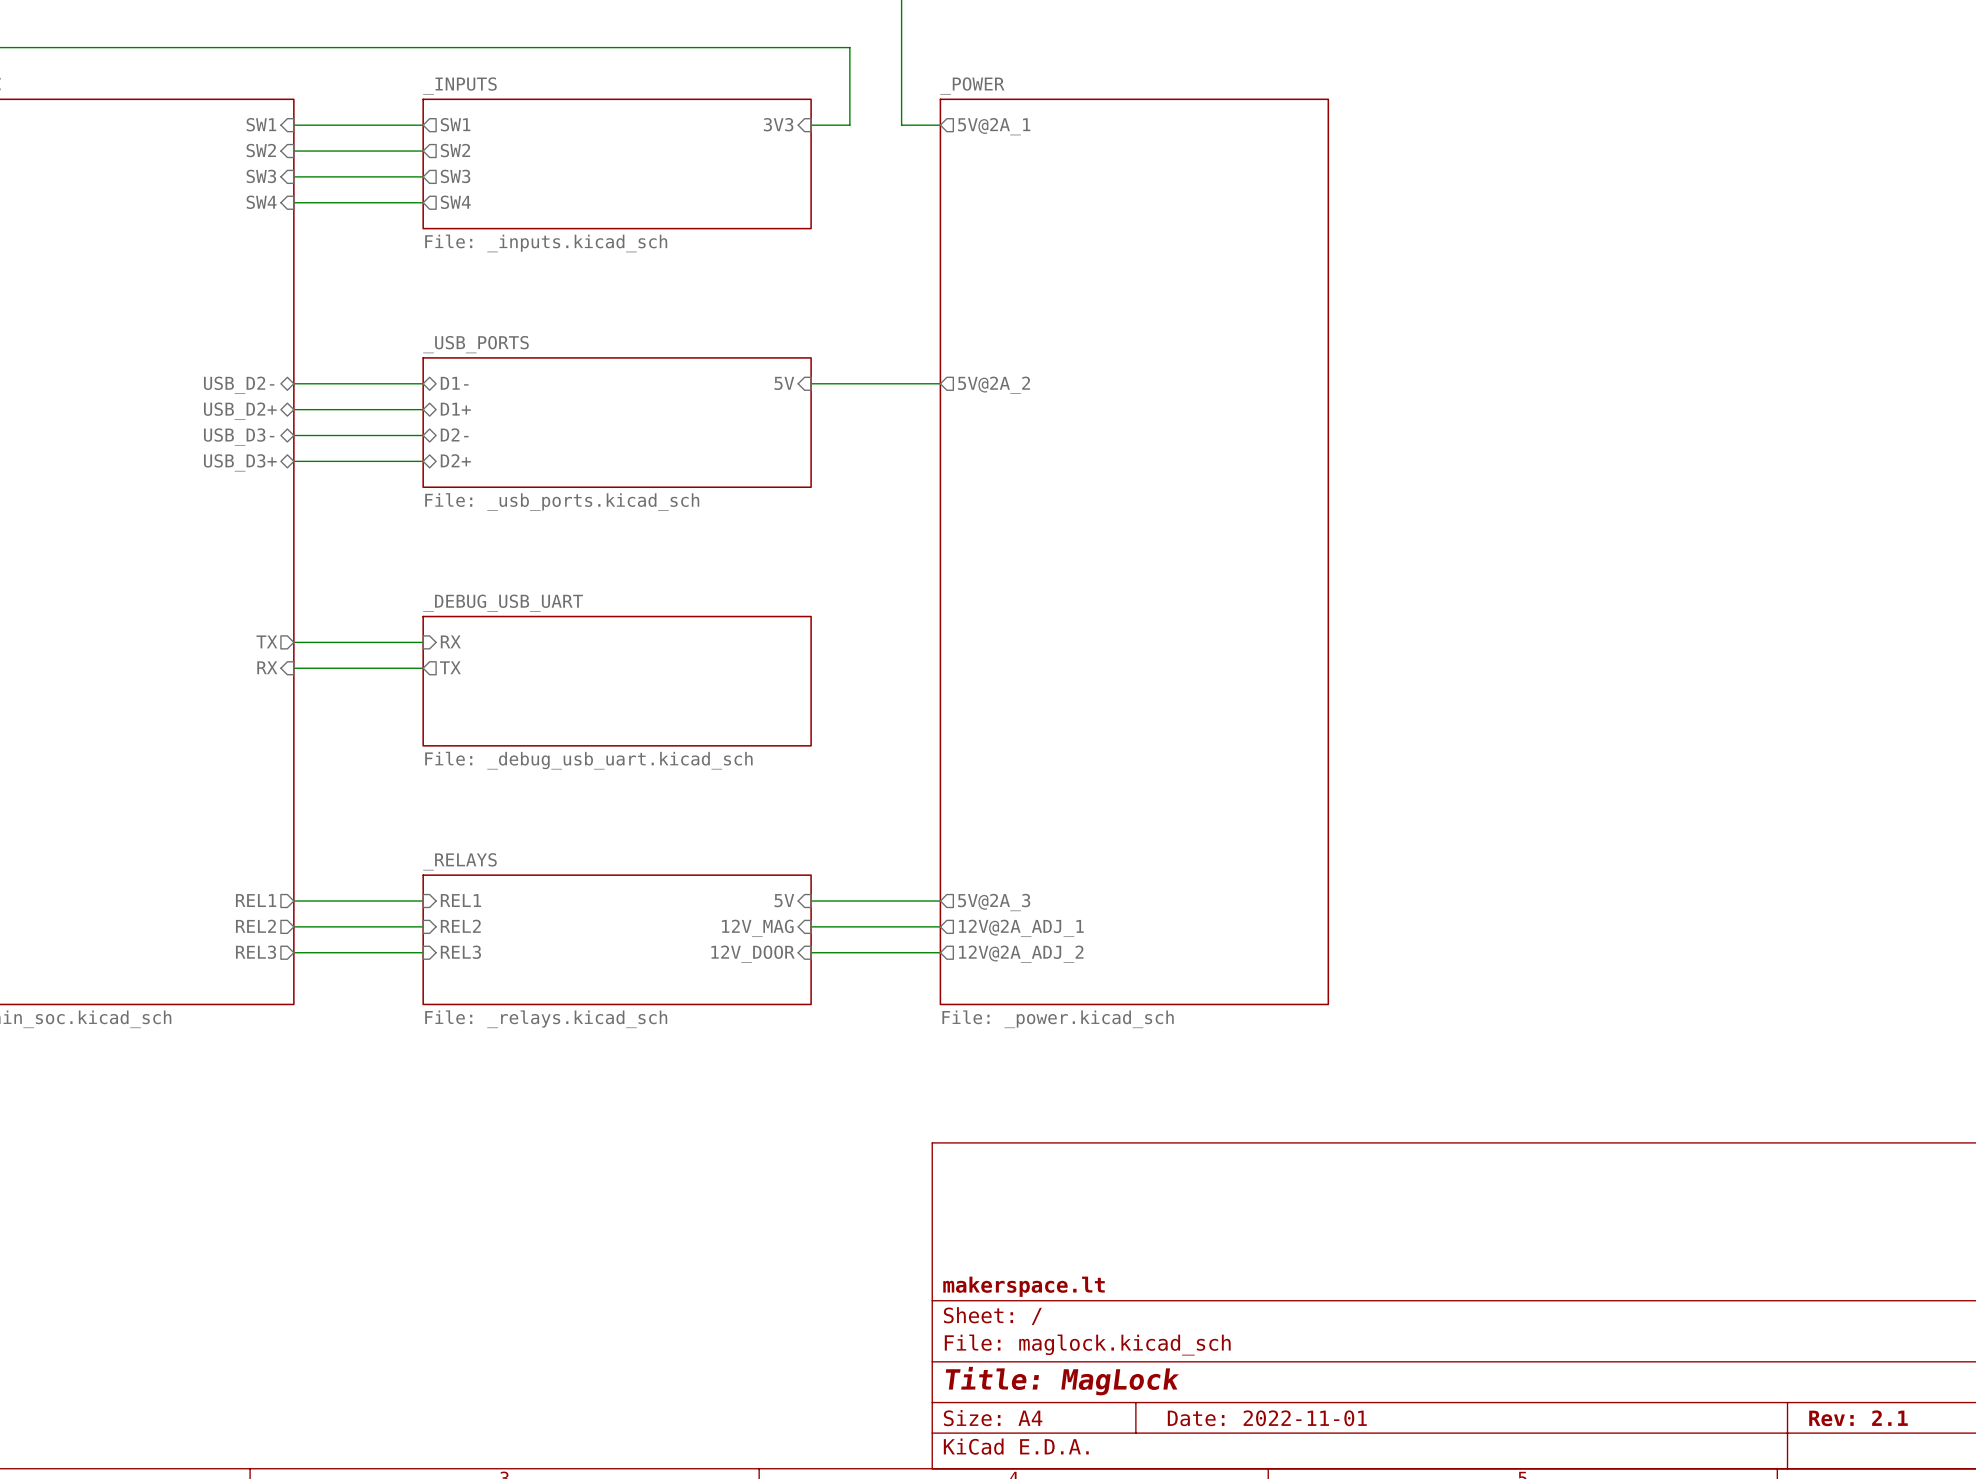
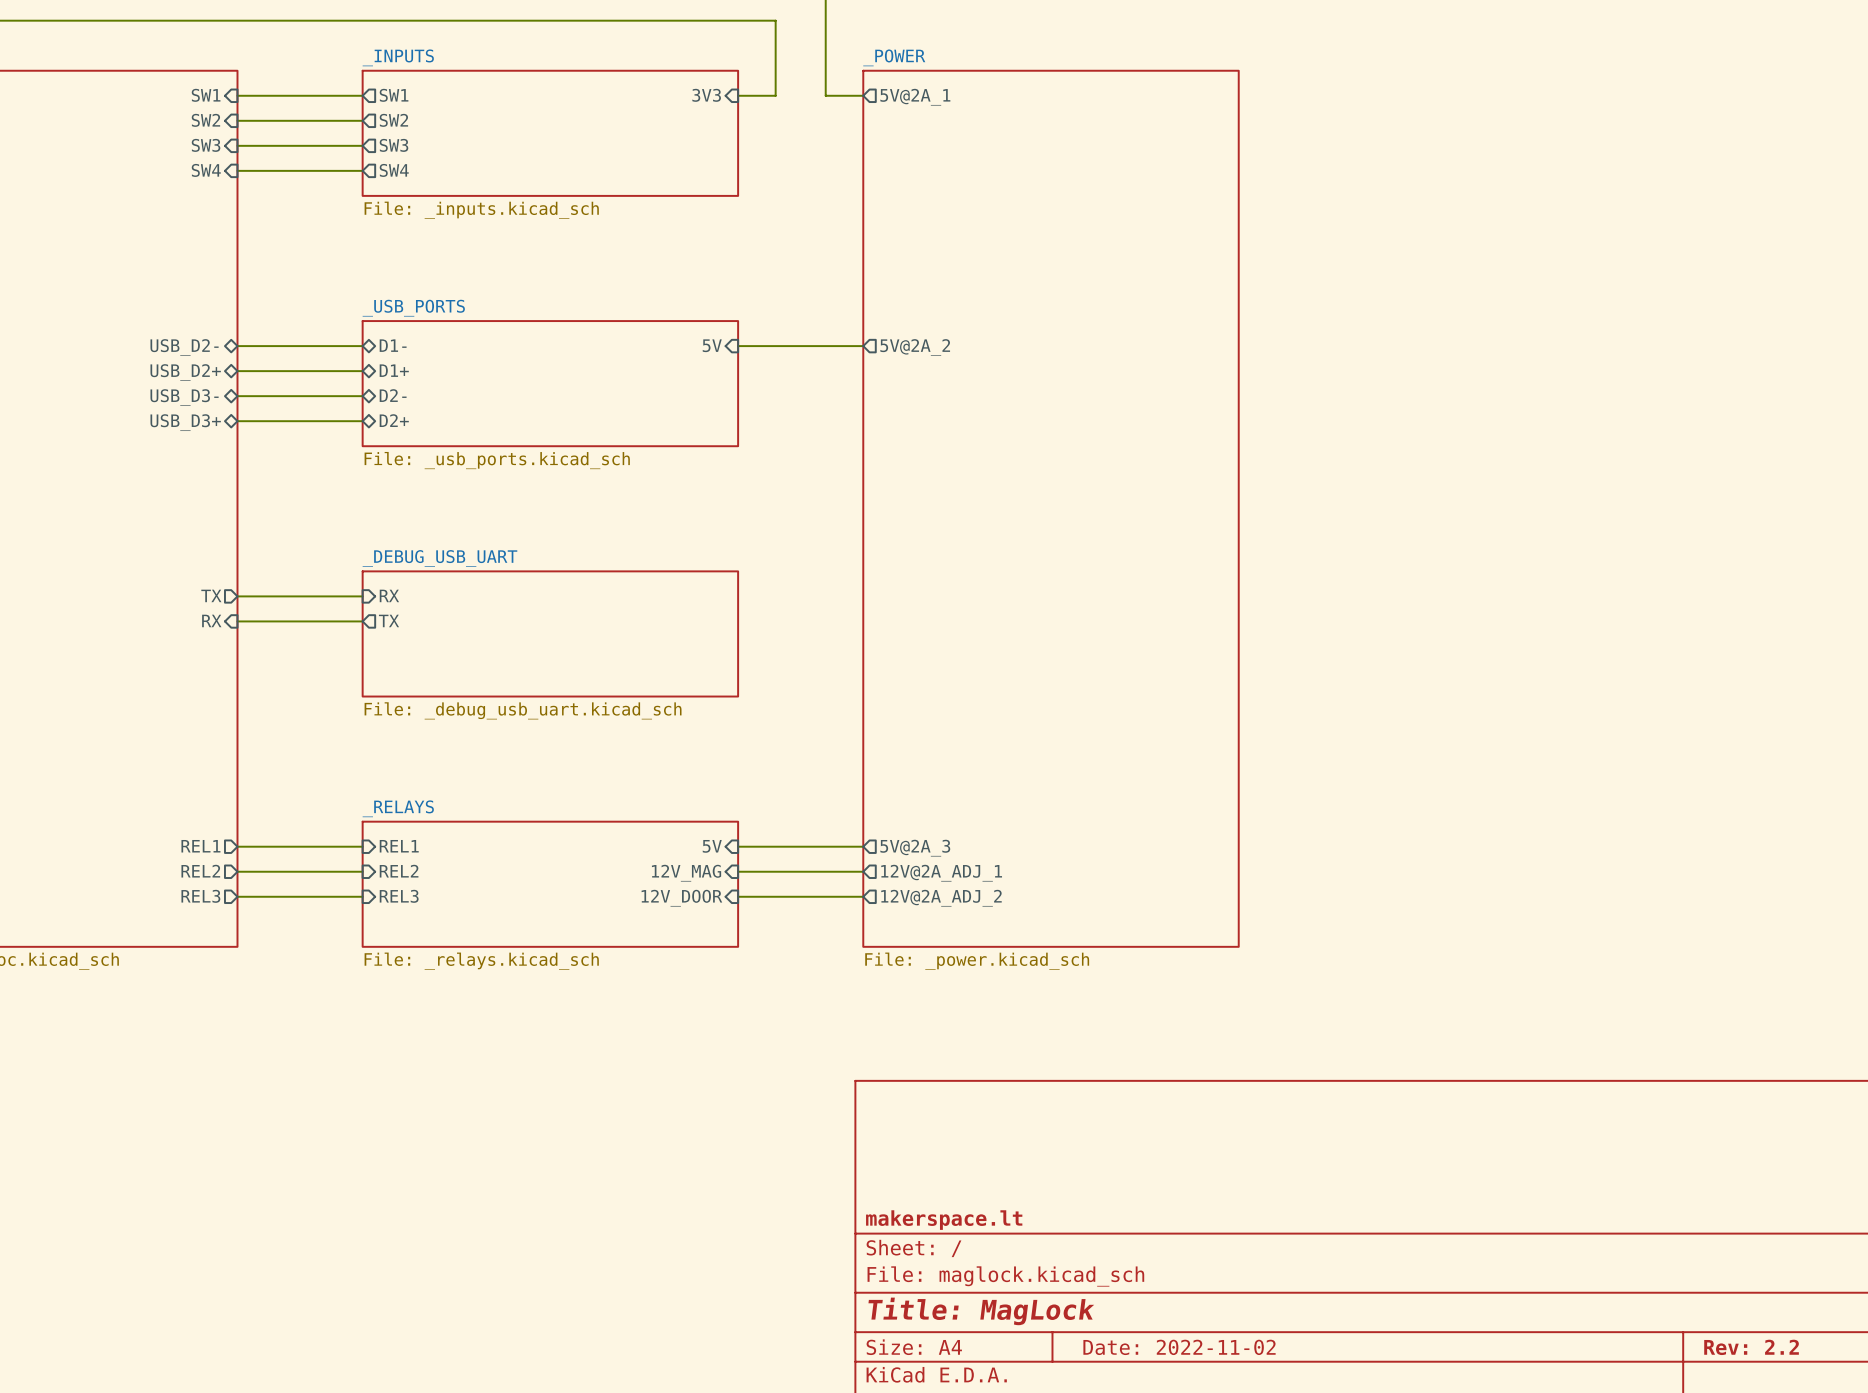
title block: Date: 2022-11-01 (1267, 1418) -> Date: 2022-11-02 (1179, 1347)
title block: Rev: 2.1 (1858, 1418) -> Rev: 2.2 (1751, 1347)

